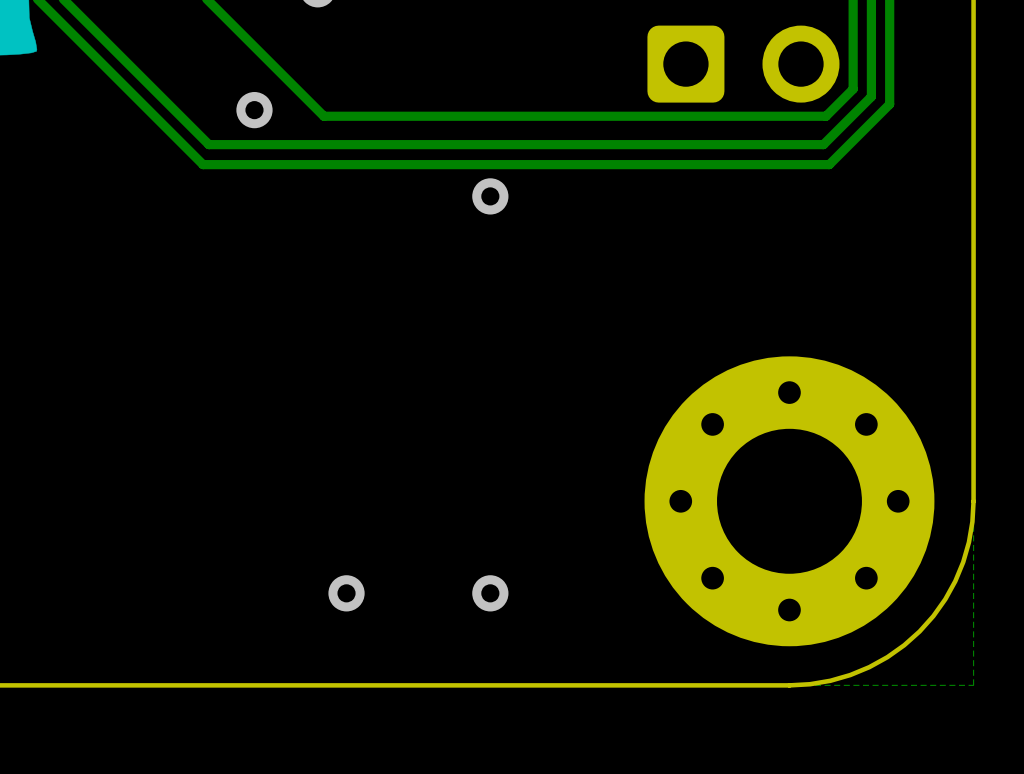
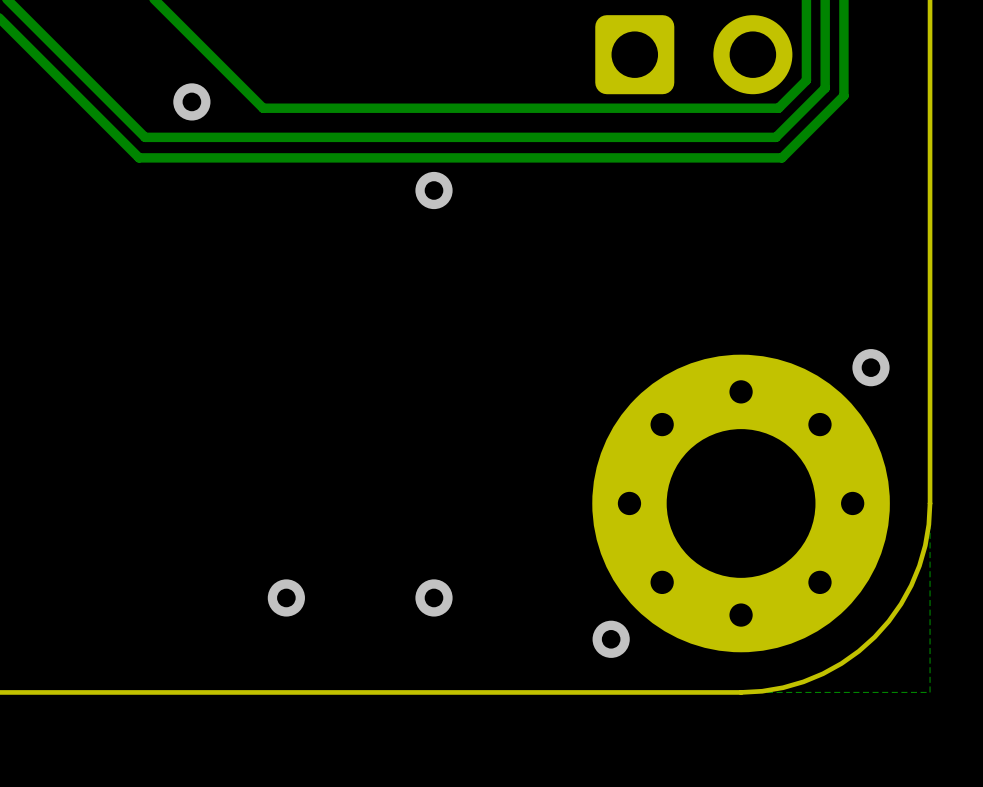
via: none -> (870, 367)
via: none -> (611, 639)

